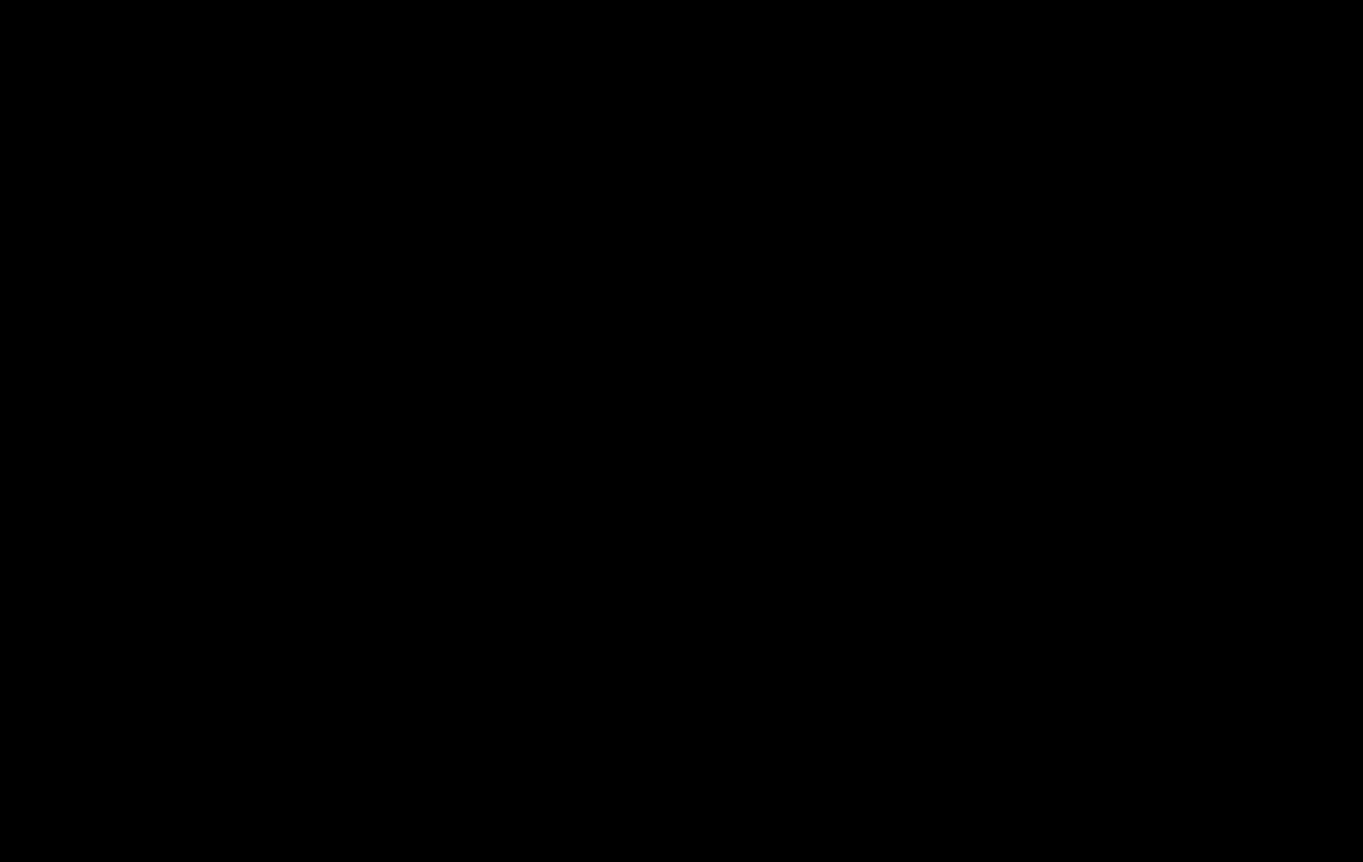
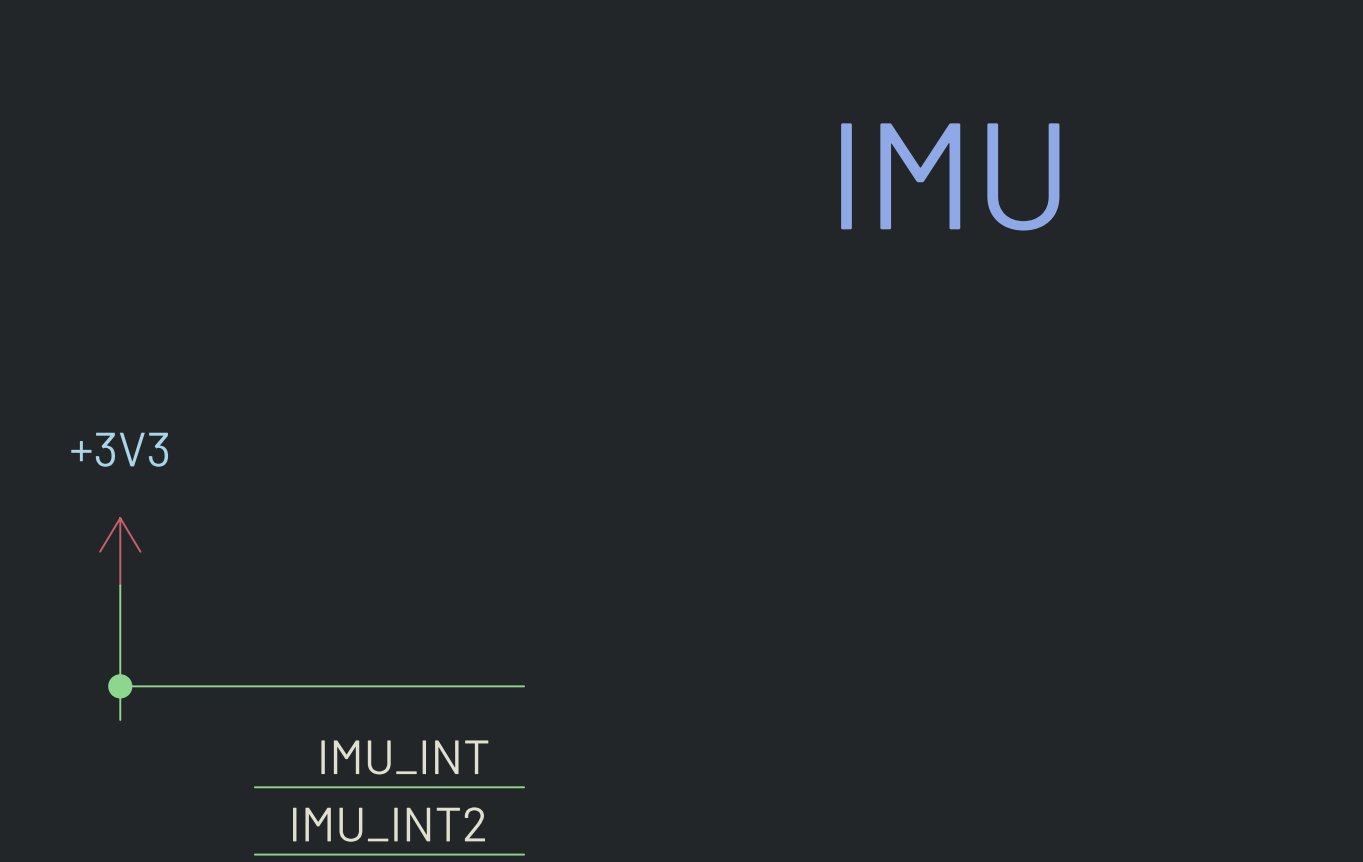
text: none -> IMU (950, 176)
power symbol: none -> +3V3 (120, 551)
wire: none -> (120, 585) (120, 719)
wire: none -> (120, 686) (524, 686)
junction: none -> (120, 686)
label: none -> IMU_INT (404, 757)
wire: none -> (254, 787) (524, 787)
label: none -> IMU_INT2 (389, 824)
wire: none -> (254, 854) (524, 854)

